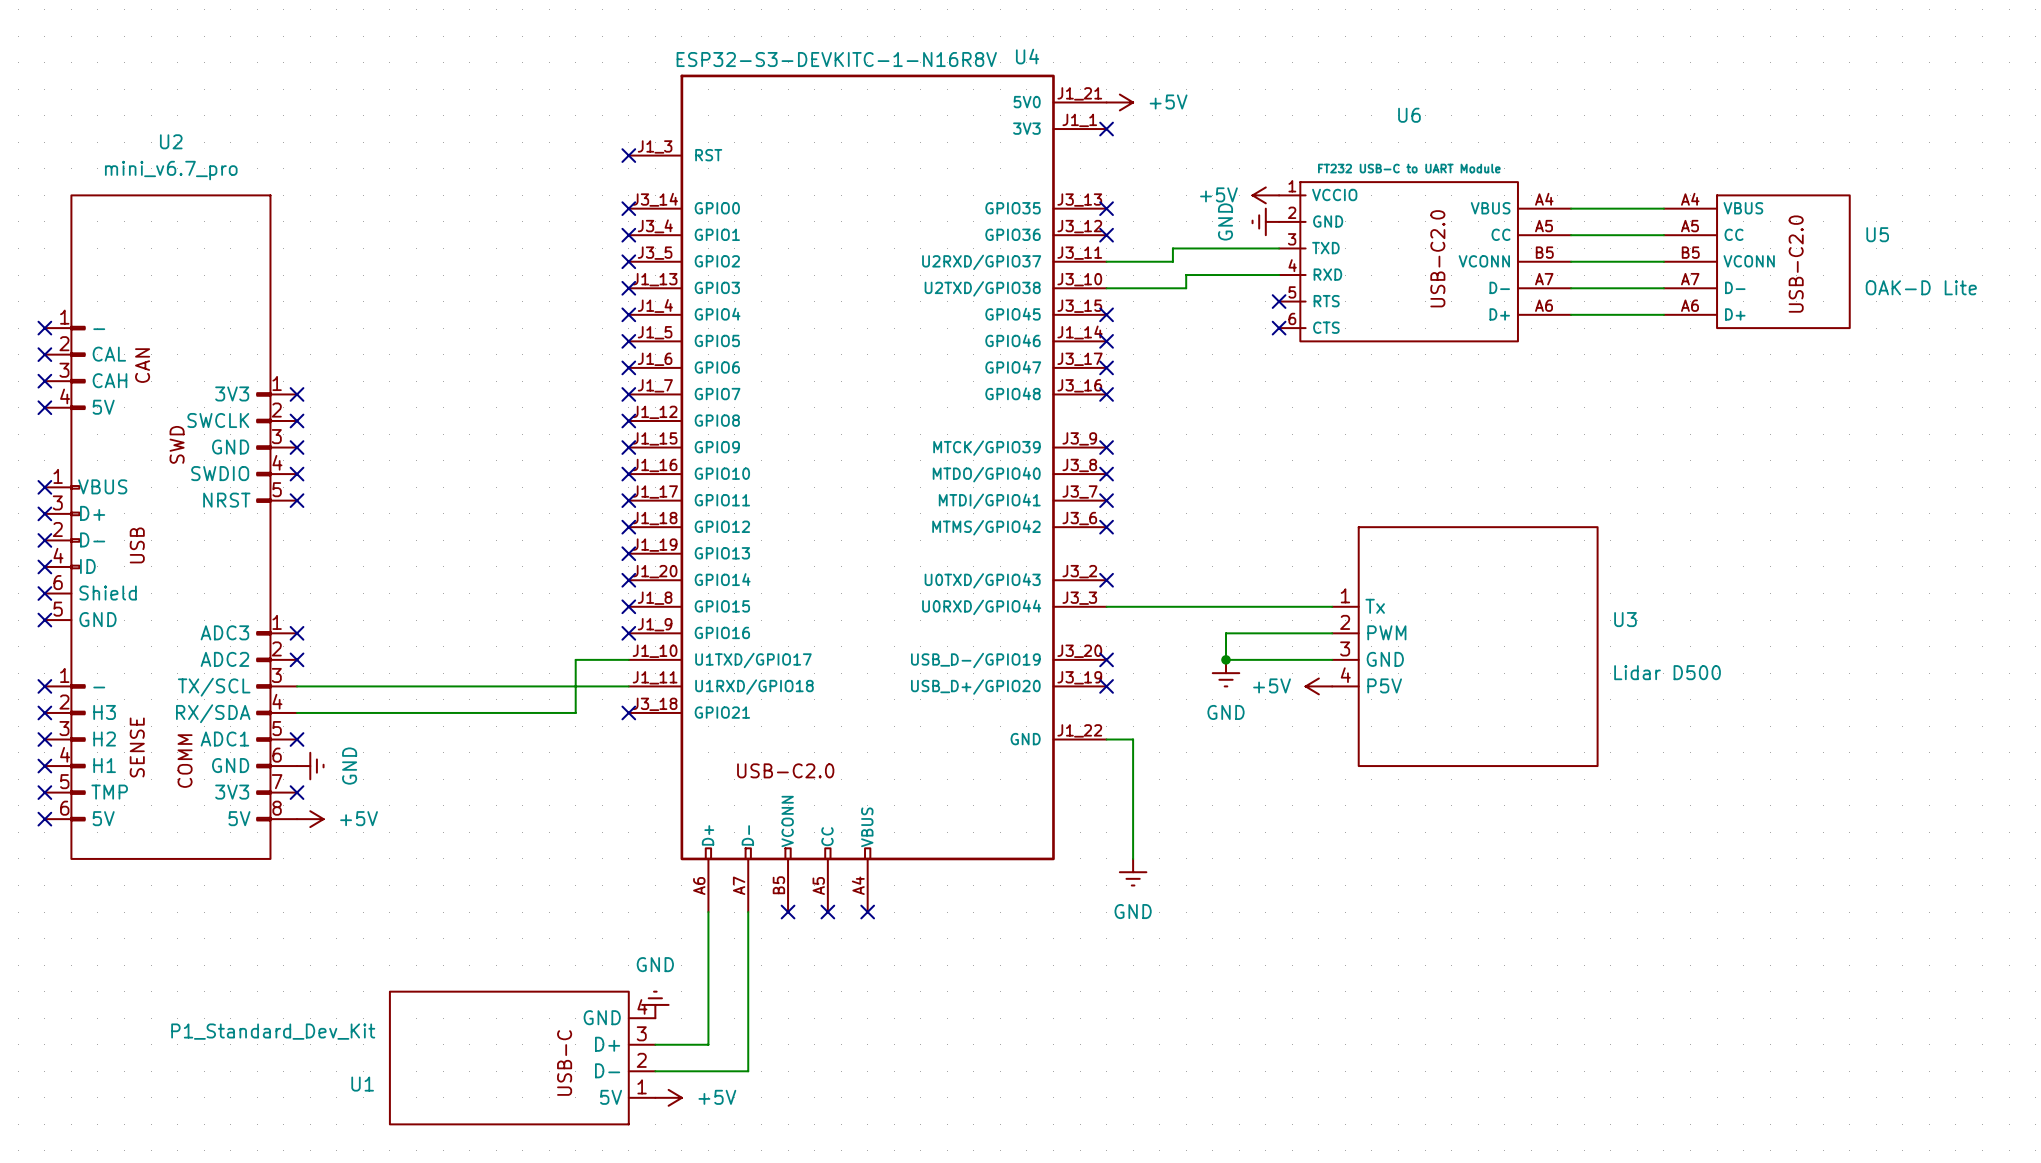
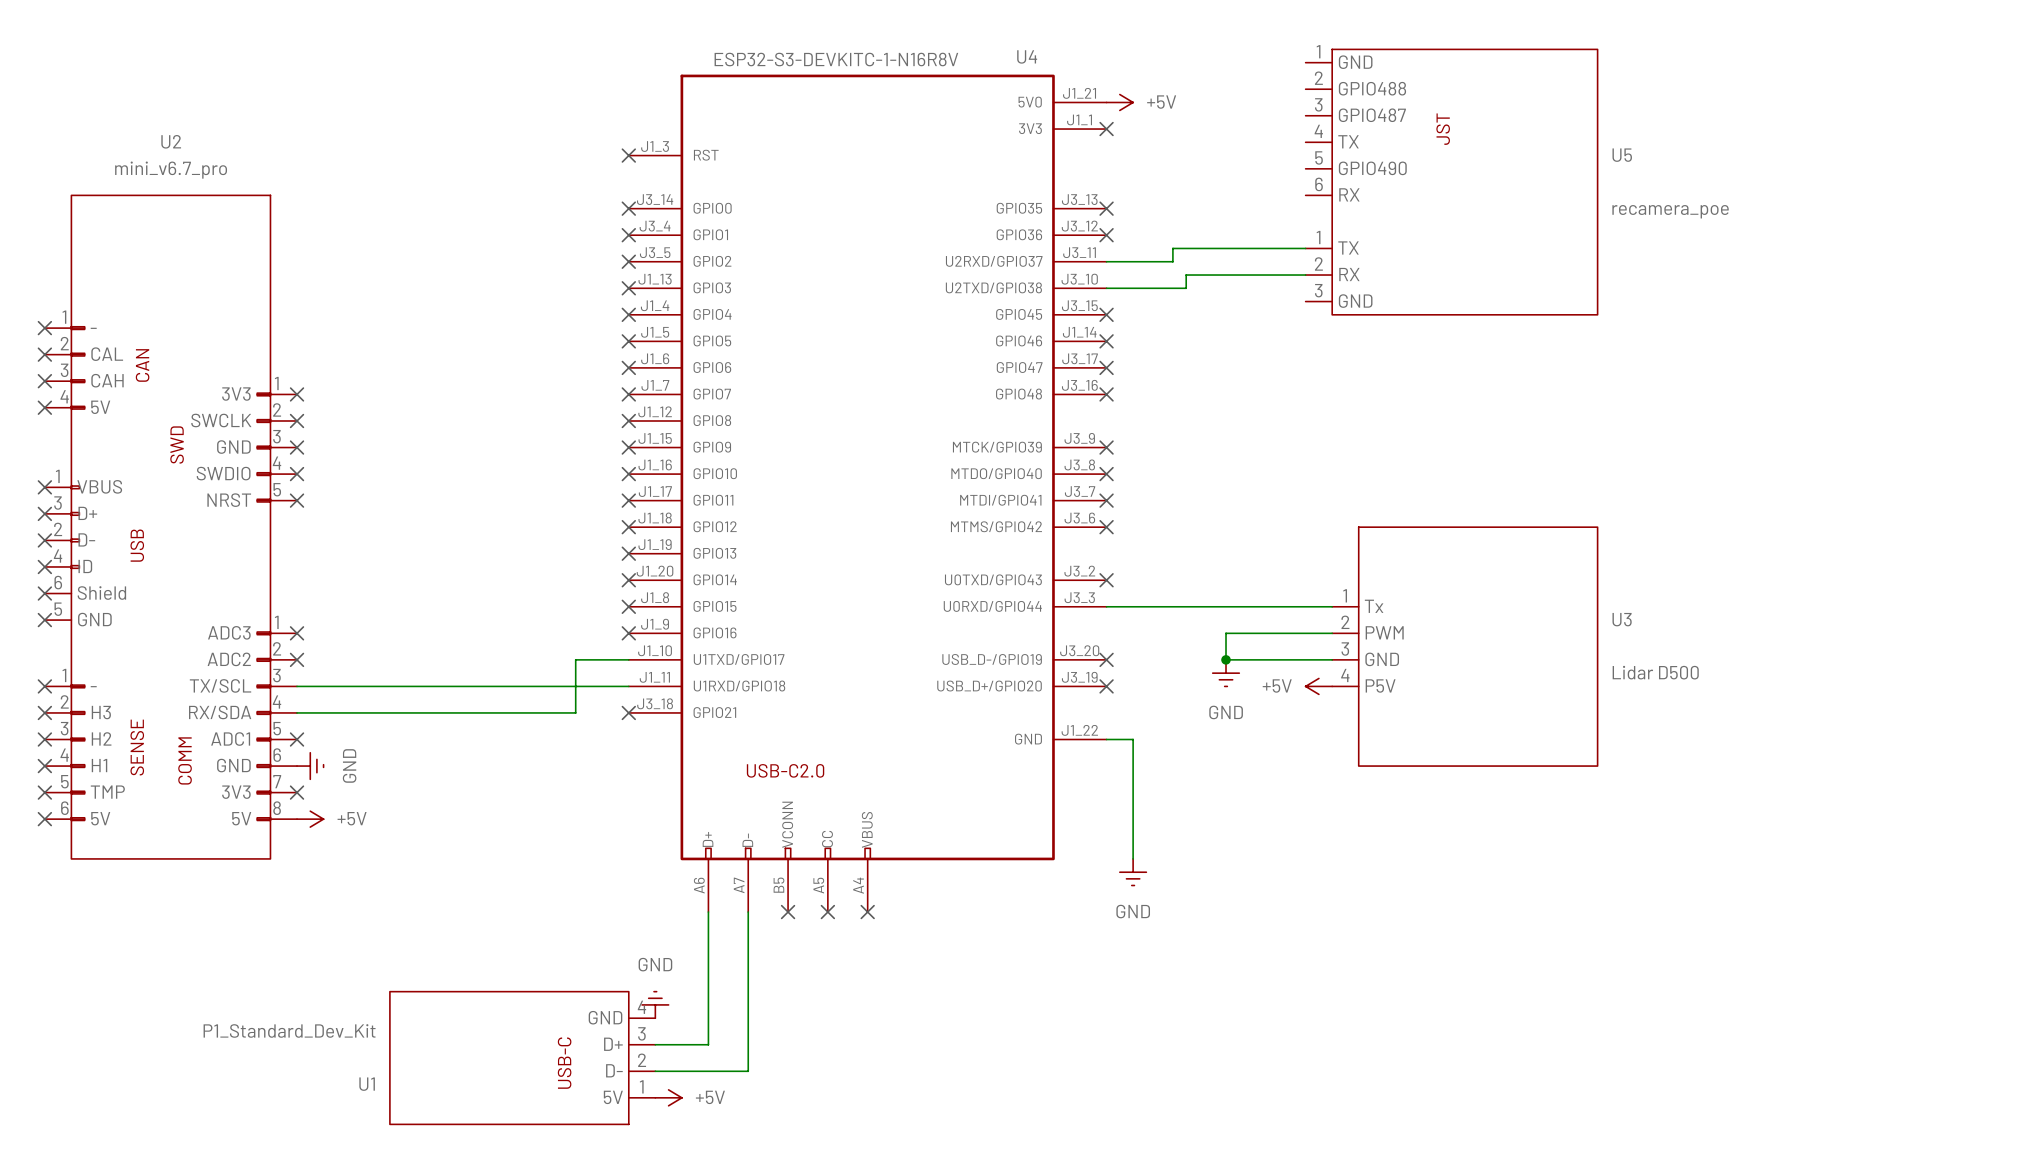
power symbol: +5V (1265, 195) -> none
U5 symbol: [1663, 195, 1850, 329] -> [1305, 49, 1598, 315]
wire: (1571, 208) (1663, 208) -> none
power symbol: GND (1265, 221) -> none
U5 name position: U5 (1877, 234) -> U5 (1622, 155)
wire: (1571, 235) (1663, 235) -> none
U6: (1425, 261) -> none
wire: (1571, 261) (1663, 261) -> none
U5 text: OAK-D Lite (1921, 287) -> recamera_poe (1670, 211)
wire: (1571, 288) (1663, 288) -> none
no-connect mark: (1279, 301) -> none
wire: (1571, 314) (1663, 314) -> none
no-connect mark: (1279, 328) -> none

